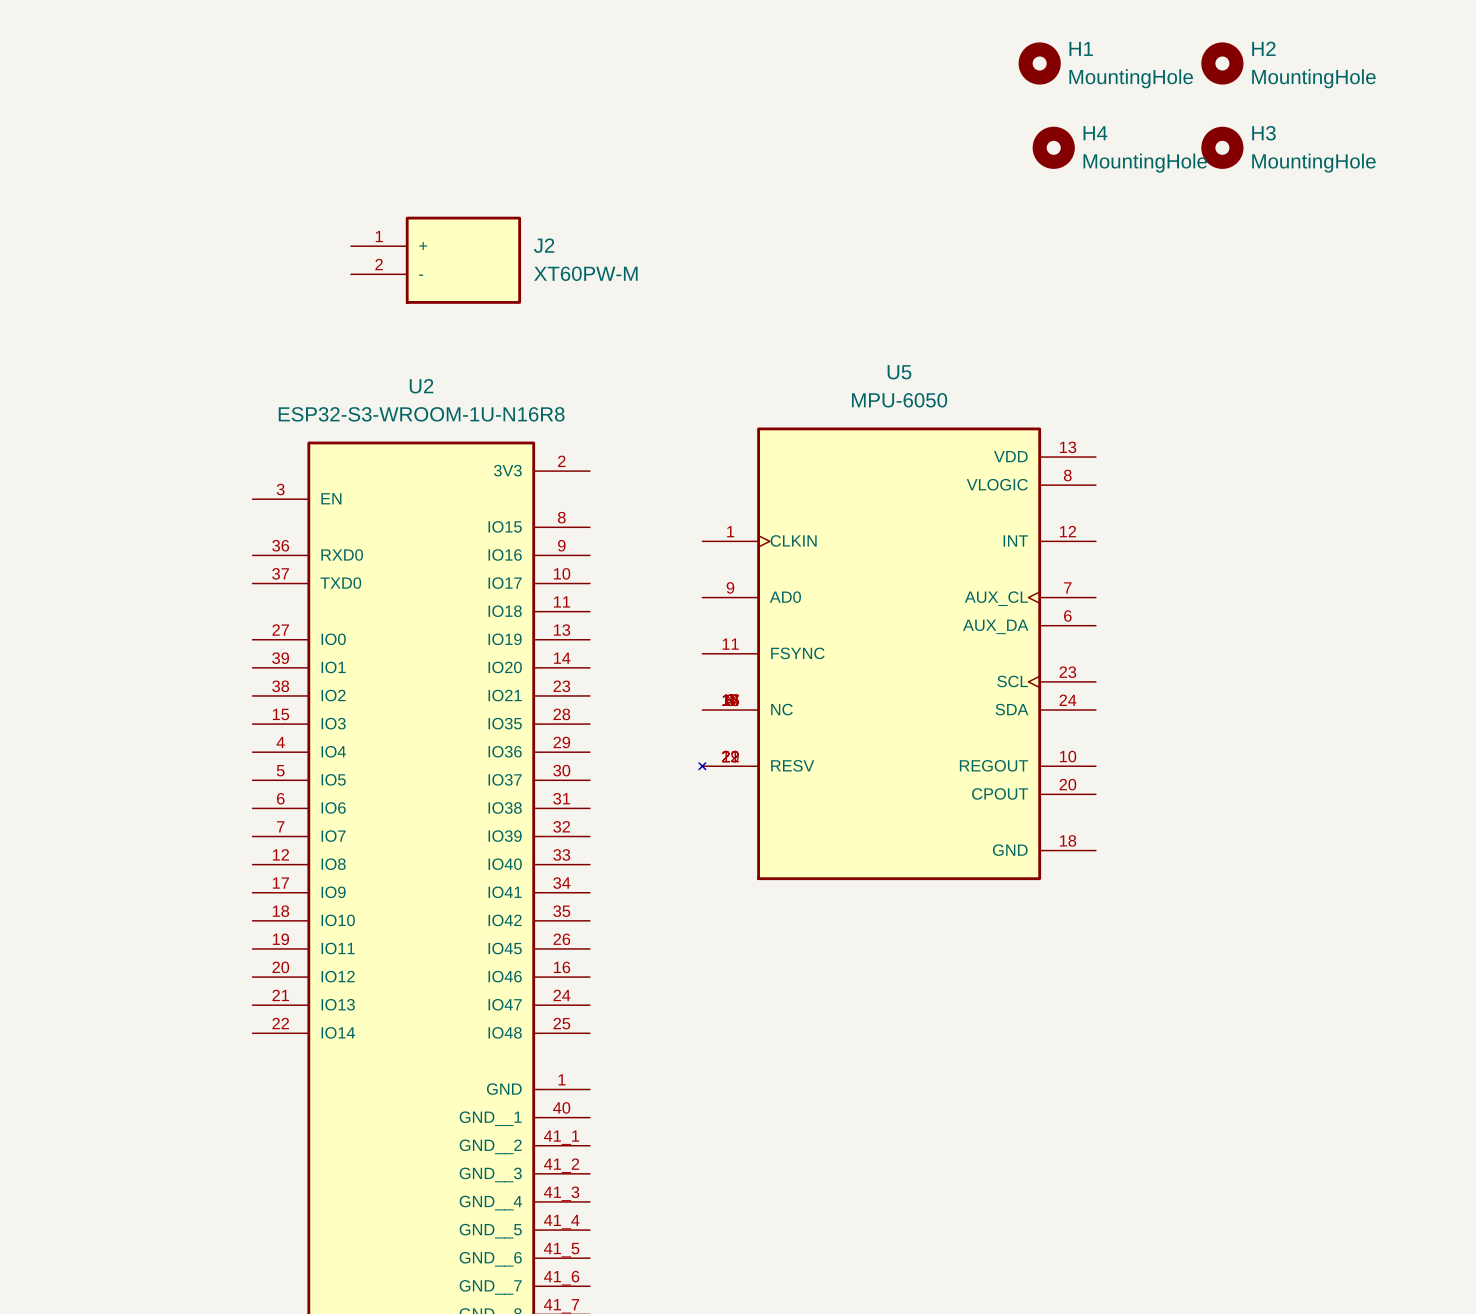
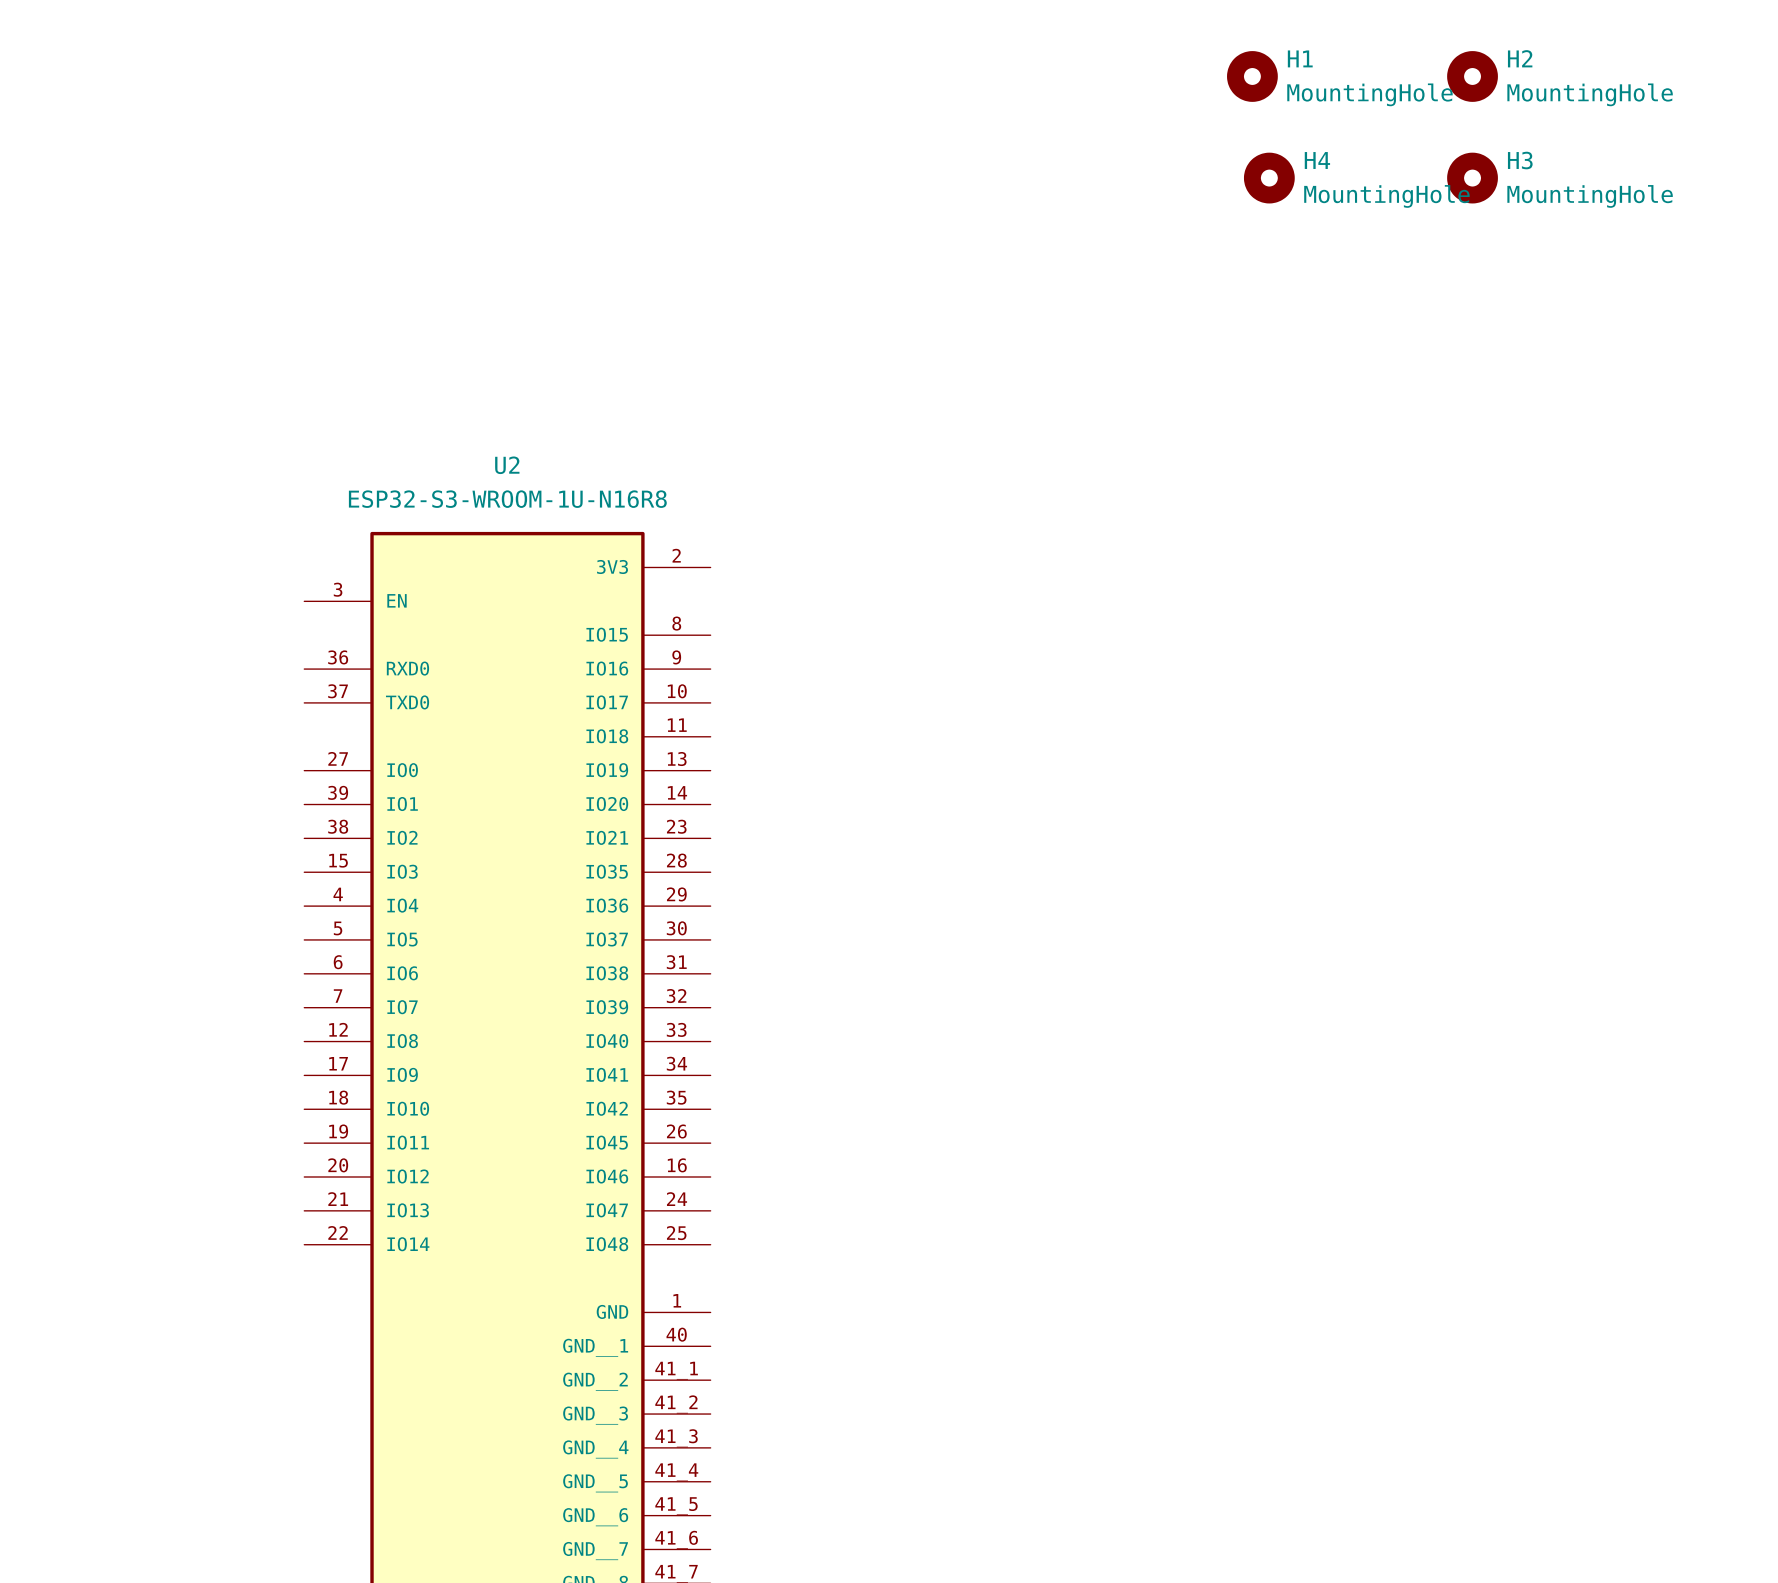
J2: XT60PW-M (436, 260) -> none
U5: MPU-6050 (897, 653) -> none

